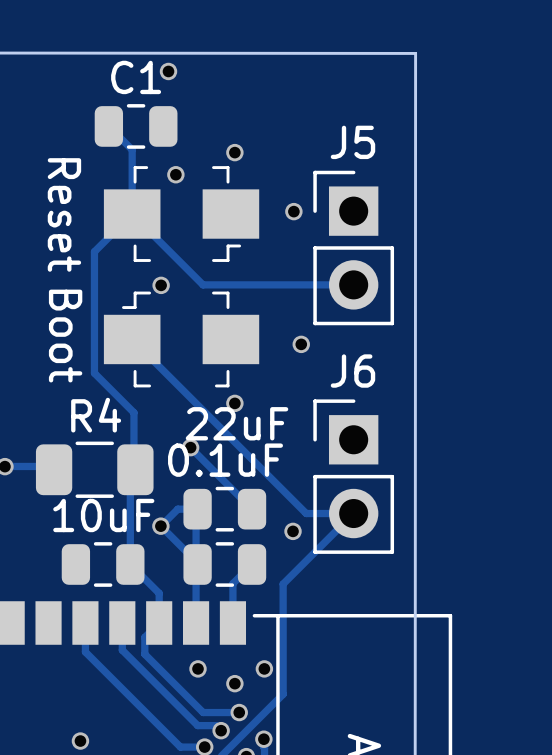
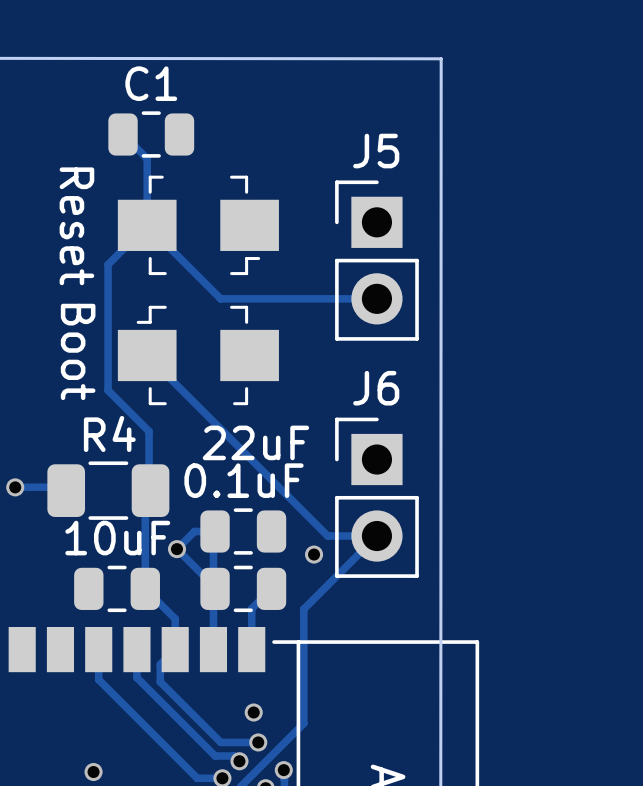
via: (168, 71) -> none
via: (234, 152) -> none
via: (175, 174) -> none
via: (293, 211) -> none
via: (161, 285) -> none
via: (301, 344) -> none
via: (234, 403) -> none
track: (190, 447) (252, 509) -> none
via: (190, 447) -> none
via: (198, 668) -> none
via: (264, 668) -> none

